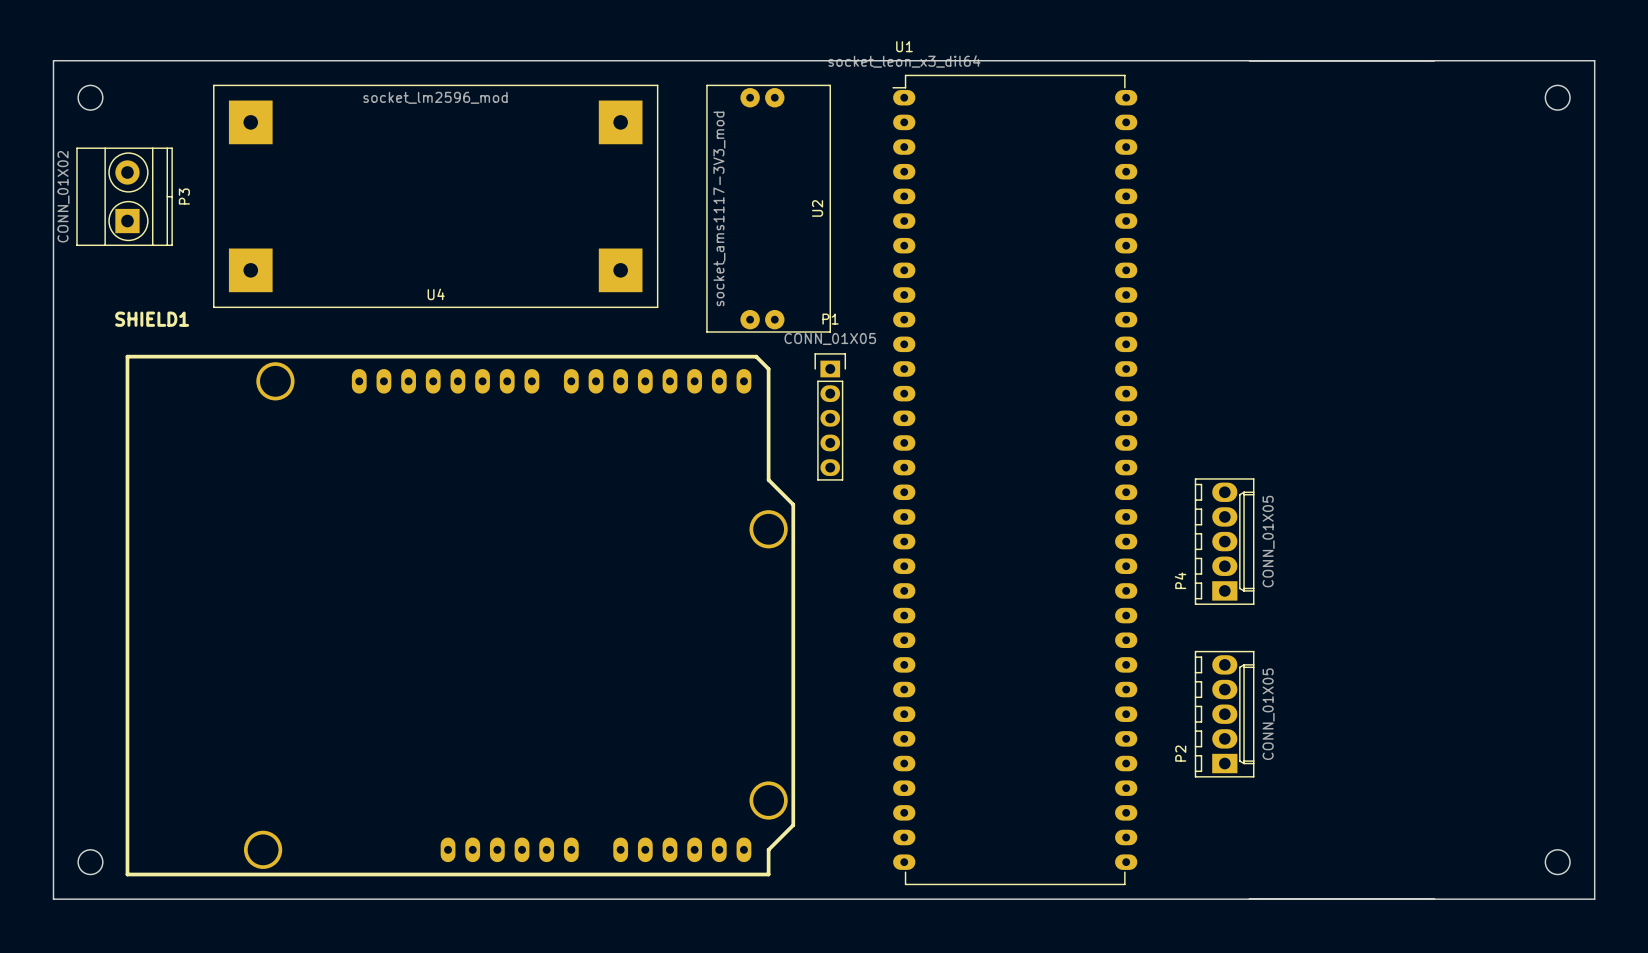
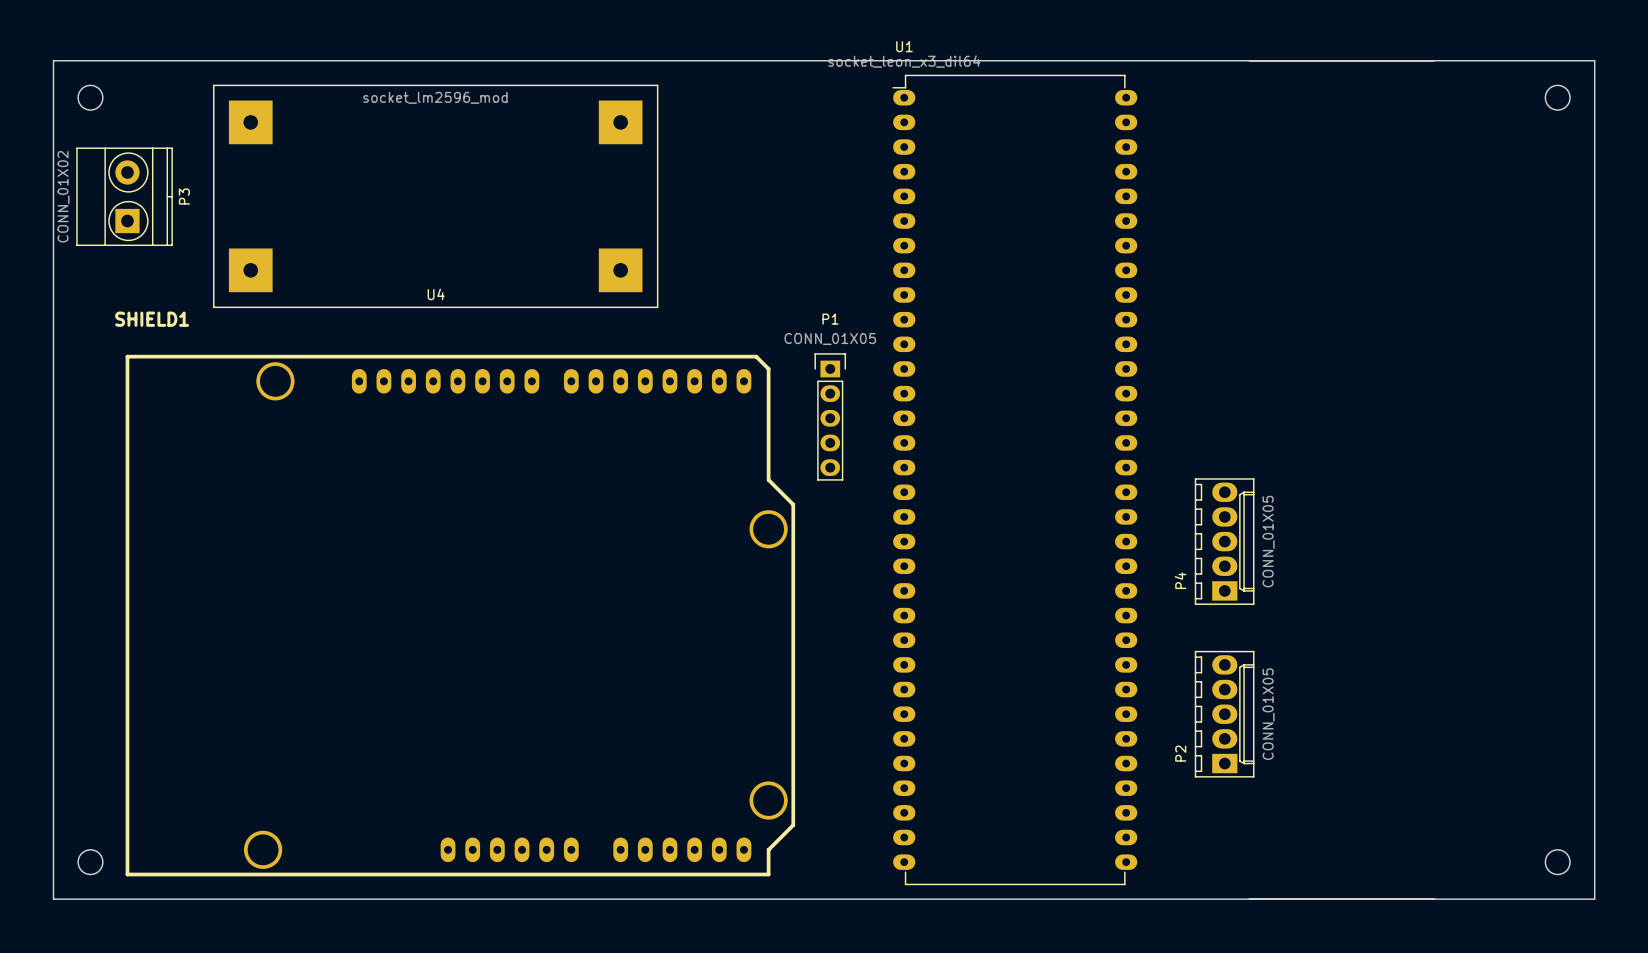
U2: socket_ams1117-3V3_mod (768, 208) -> none

